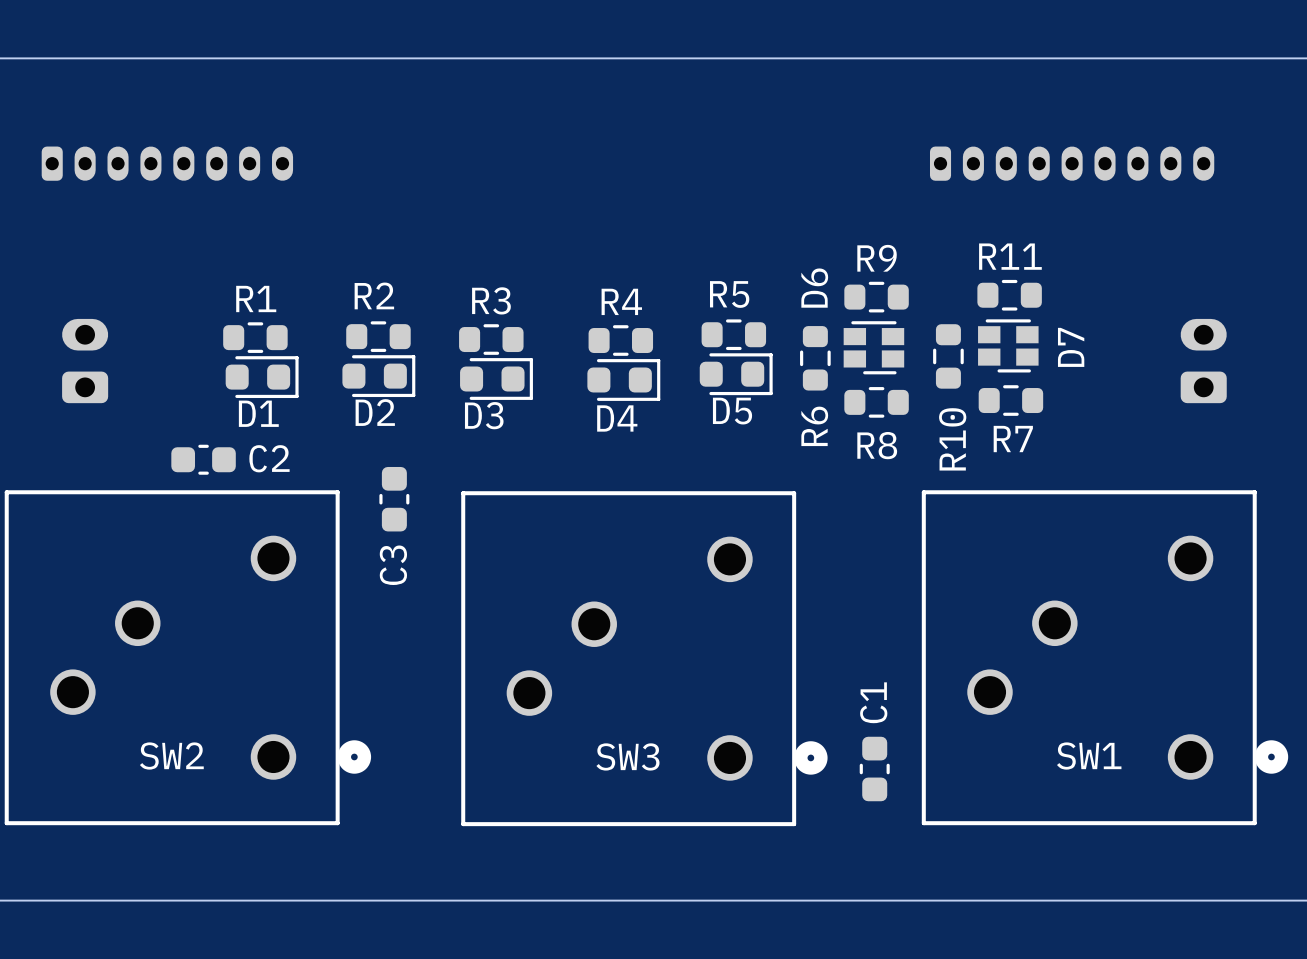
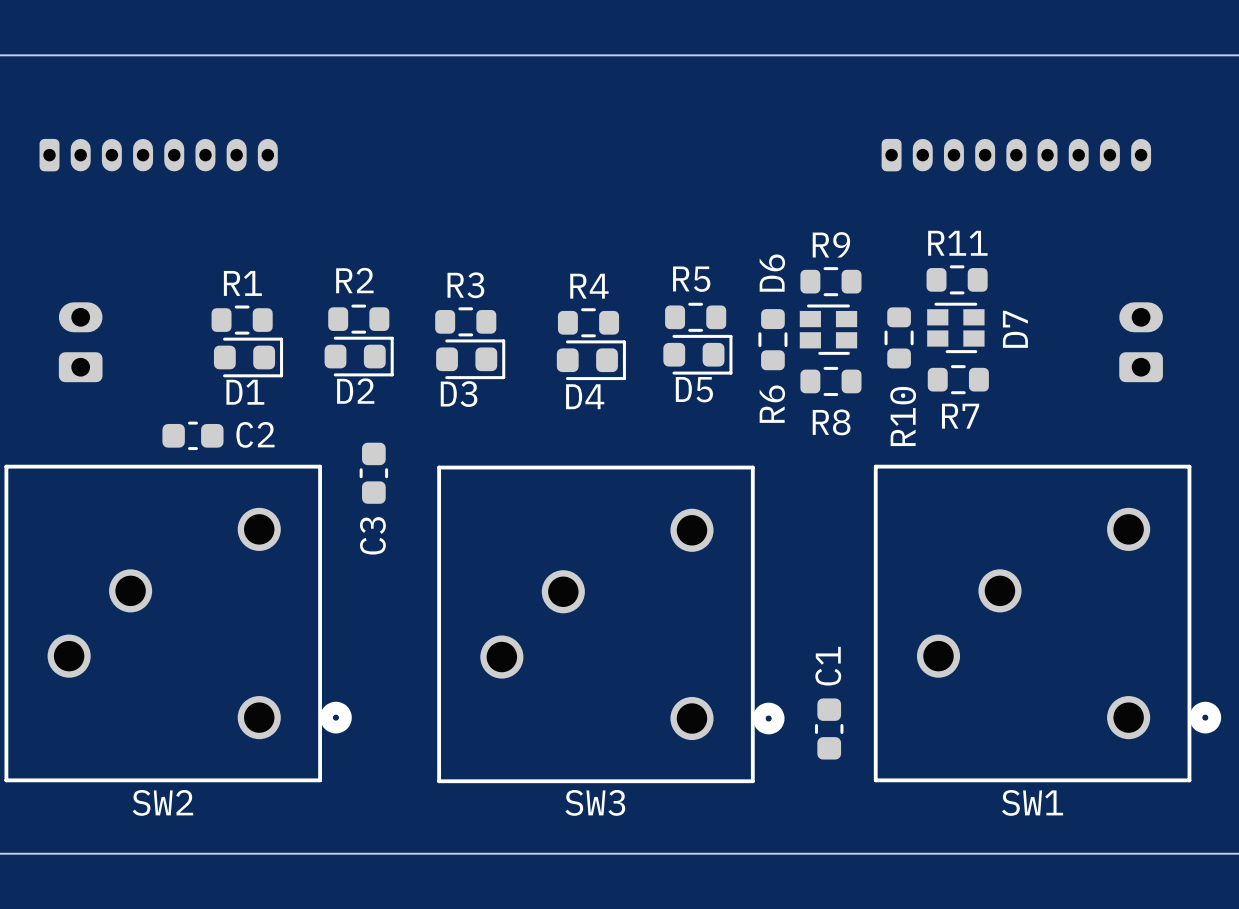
SW2 name position: SW2 (171, 756) -> SW2 (162, 802)
SW3 name position: SW3 (627, 756) -> SW3 (595, 802)
SW1 name position: SW1 (1089, 756) -> SW1 (1032, 802)

